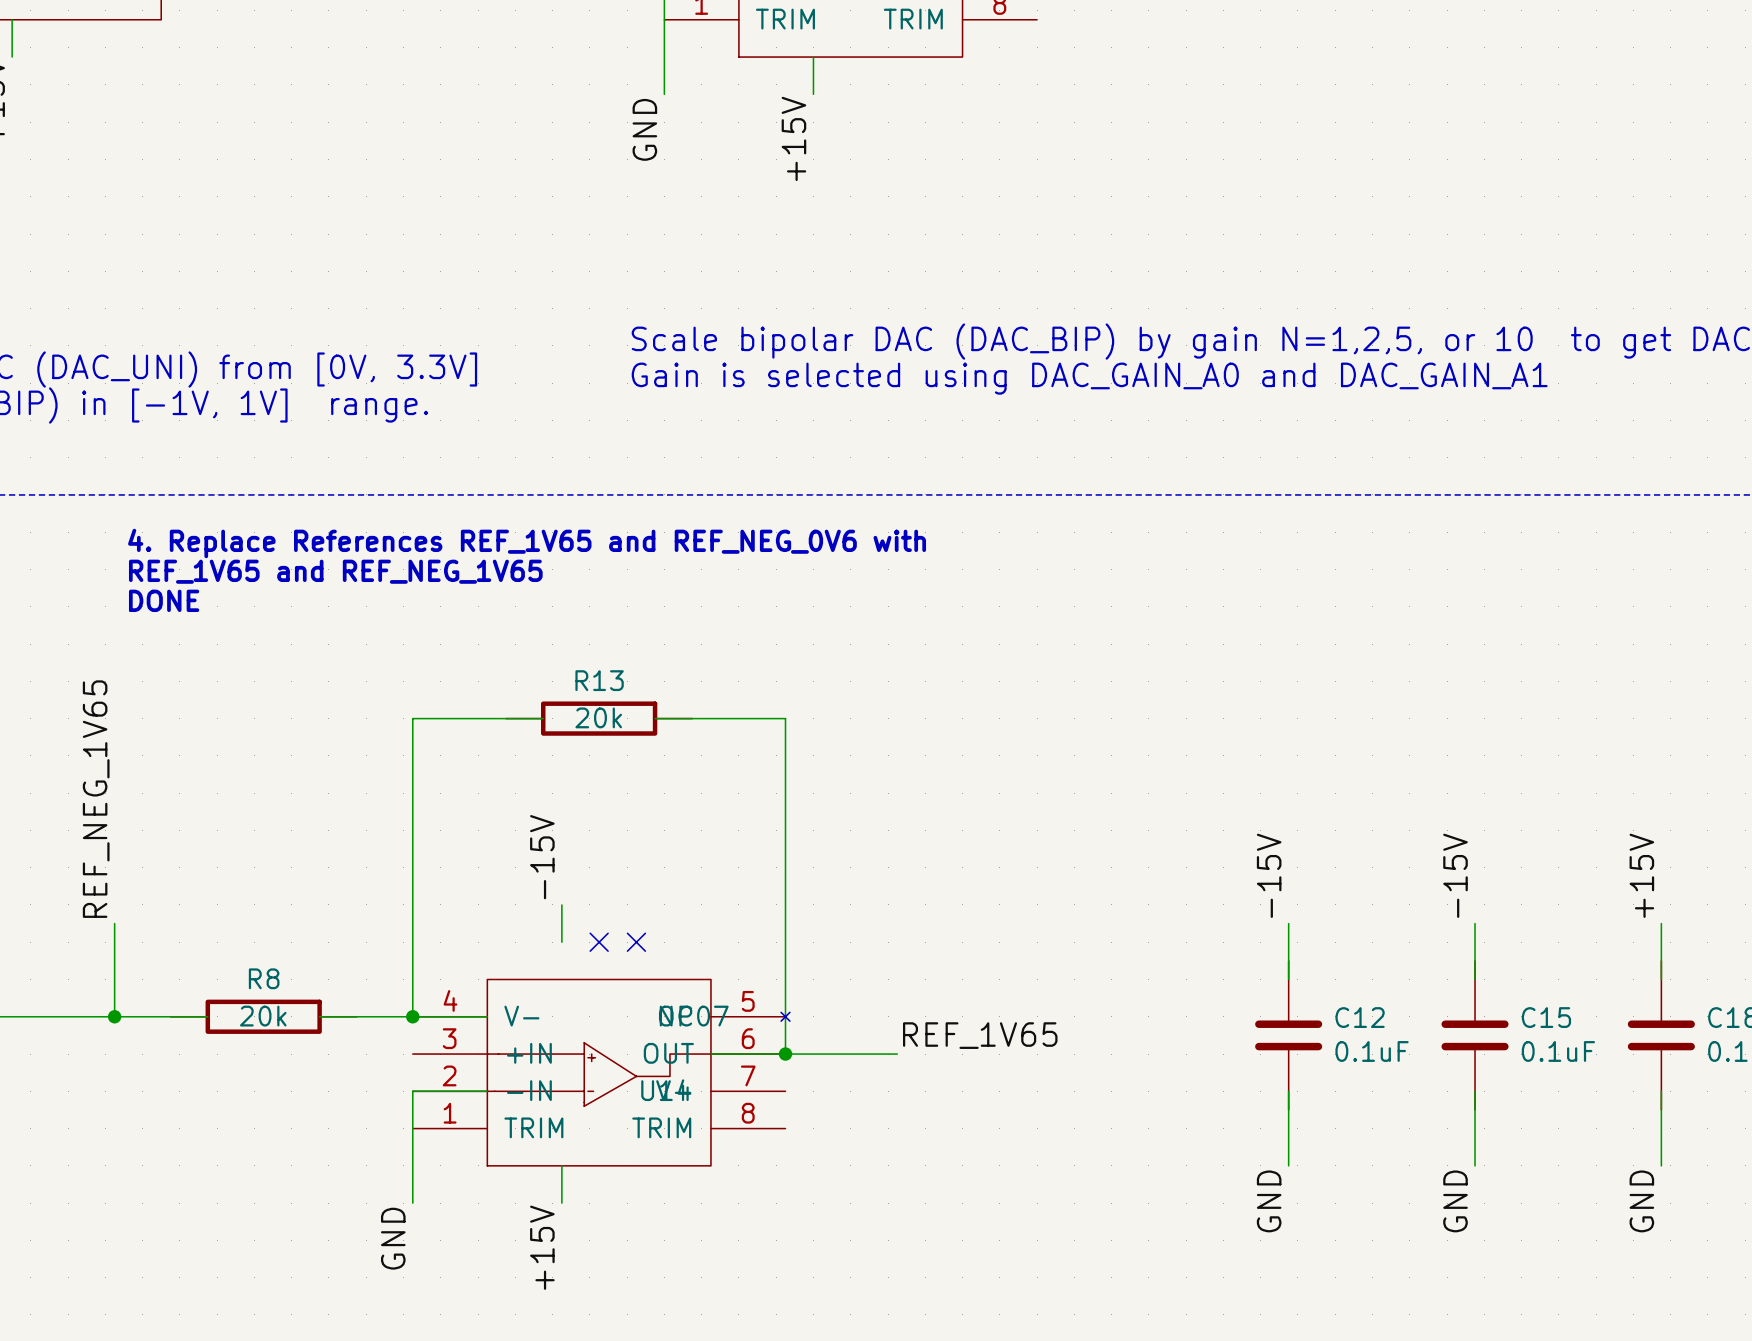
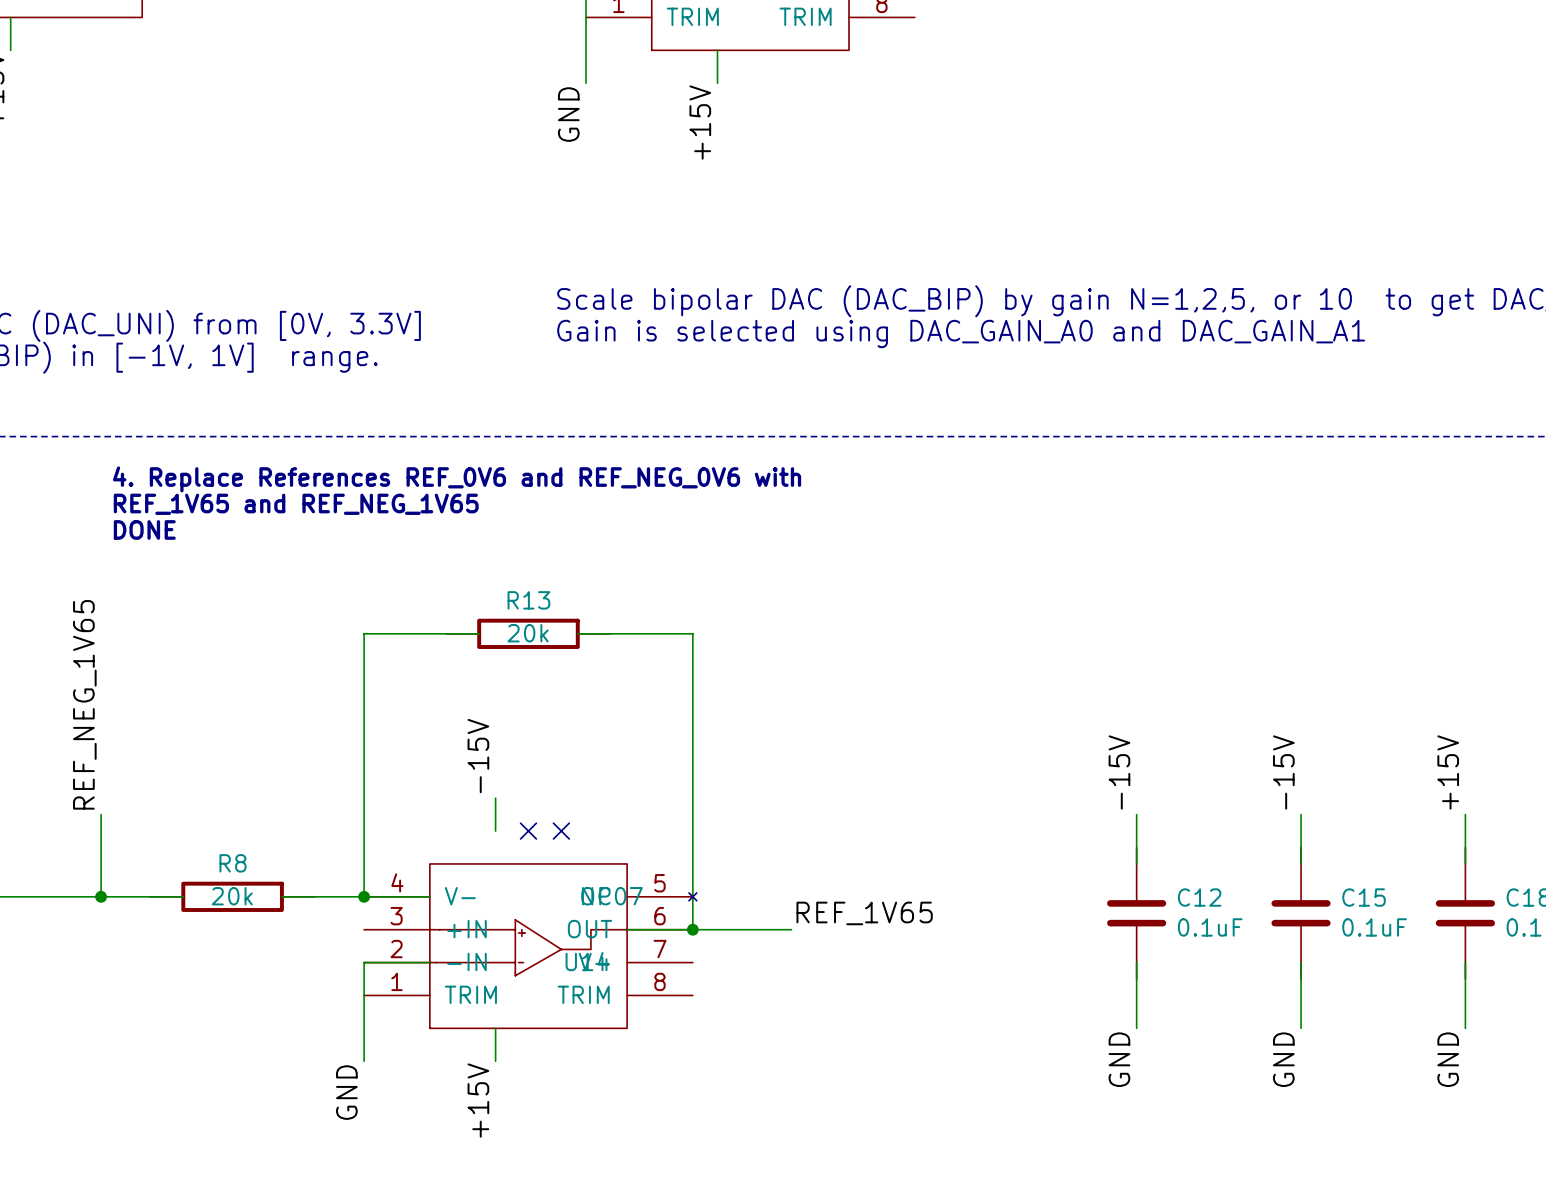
text: 4. Replace References REF_1V65 and REF_NEG_0V6 with (527, 543) -> 4. Replace References REF_0V6 and REF_NEG_0V6 with (457, 479)

